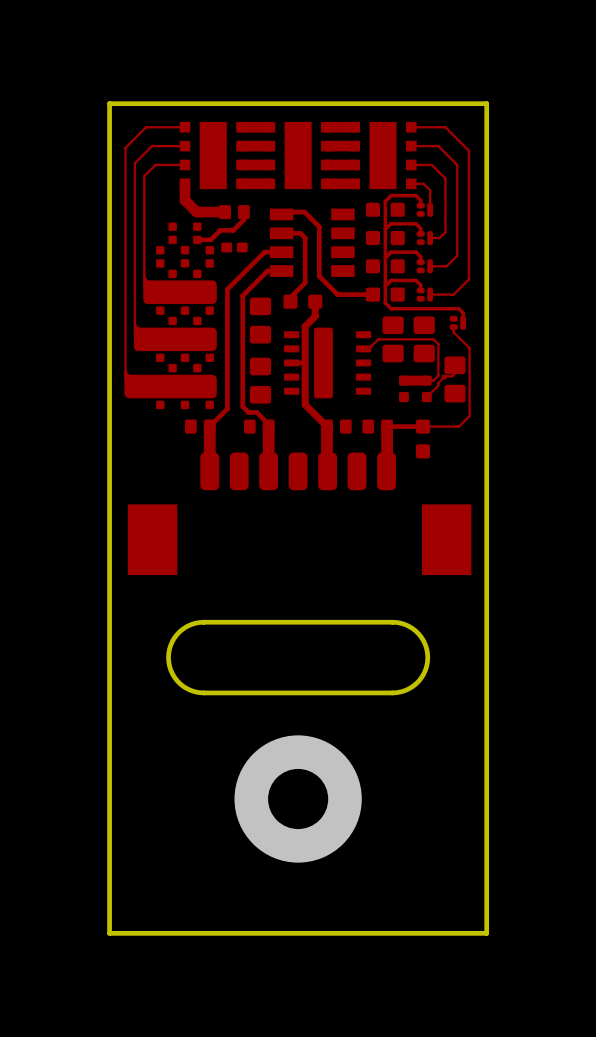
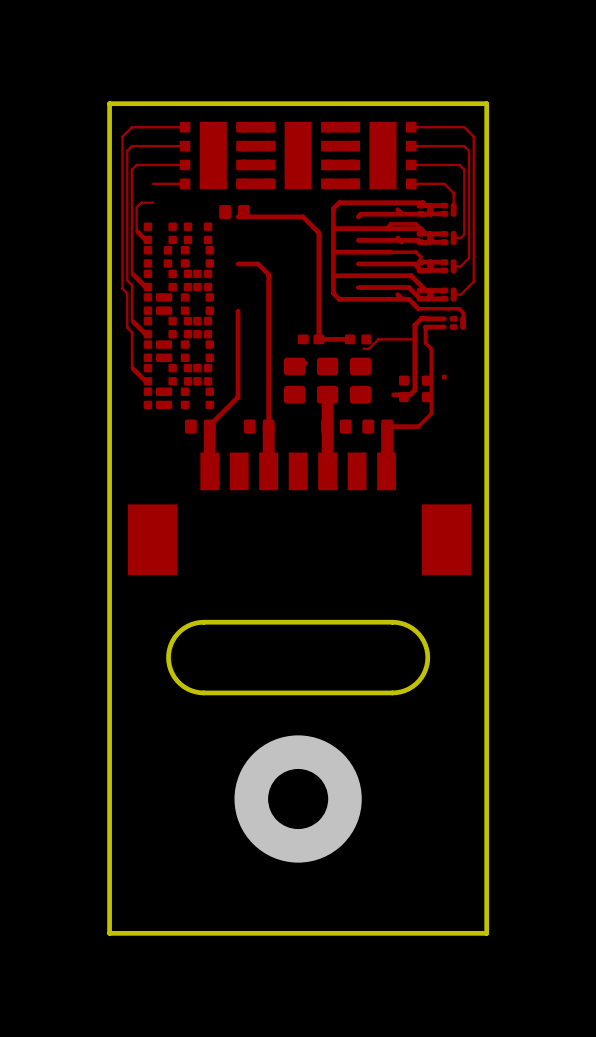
top track: (146, 127) (125, 147) -> (146, 127) (131, 127) (122, 136) (122, 288) (127, 293) (127, 327) (131, 332) (131, 367) (146, 382)
top track: (445, 127) (464, 146) -> (438, 146) (464, 146)
top track: none -> (445, 127) (464, 127) (473, 136) (473, 281) (460, 294) (453, 294)
top track: (152, 146) (134, 163) (134, 332) -> (152, 146) (131, 146) (127, 150) (127, 280) (131, 285) (131, 320) (146, 335)
top track: (438, 146) (457, 164) (457, 255) (446, 266) (430, 266) -> none
top track: (125, 147) (125, 379) -> none
top track: (155, 164) (144, 176) (144, 285) -> (155, 164) (136, 164) (131, 169) (131, 273) (146, 288)
top track: (431, 164) (445, 178) (445, 232) (439, 238) (430, 238) -> (431, 164) (459, 164) (464, 169) (464, 234) (460, 238) (453, 238)
top track: (185, 183) (185, 200) (196, 212) (225, 212) -> (185, 183) (153, 183)
top track: (423, 183) (430, 190) (430, 209) -> (423, 183) (444, 183) (453, 193) (453, 209)
top track: none -> (153, 202) (141, 202) (136, 207) (136, 230) (146, 241)
top track: (420, 205) (420, 200) (415, 195) (391, 195) (385, 201) (385, 302) (391, 308) (418, 308) -> (444, 205) (425, 205) (422, 202) (339, 202) (333, 208) (333, 293) (339, 299) (408, 299) (418, 308)
part: (385, 209) -> none
part: none -> (448, 209)
top track: (243, 212) (243, 219) (233, 230) (220, 230) (210, 239) (197, 239) -> none
top track: none -> (444, 213) (360, 214) (358, 216)
top track: (281, 214) (283, 212) (304, 212) (319, 226) (319, 276) (337, 294) (372, 294) -> none
top track: none -> (238, 216) (302, 216) (318, 232) (318, 339) (349, 339)
top track: none -> (333, 228) (420, 228) (425, 233) (444, 233)
part: none -> (147, 233)
part: none -> (187, 233)
part: (197, 233) -> none
part: none -> (207, 233)
top track: (281, 233) (300, 233) (305, 238) (305, 282) (290, 297) (290, 301) -> none
part: (385, 238) -> none
part: none -> (448, 238)
top track: none -> (358, 240) (444, 242)
part: (312, 242) -> none
part position: (234, 247) -> (311, 339)
top track: (281, 252) (264, 252) (227, 289) (227, 408) (209, 426) -> (238, 311) (238, 397) (209, 426)
top track: (391, 252) (385, 258) -> (391, 252) (333, 252)
part: none -> (147, 256)
part: (160, 256) -> none
part: none -> (167, 256)
top track: (469, 258) (469, 279) (453, 294) (430, 294) -> (469, 258) (460, 266) (453, 266)
top track: none -> (444, 262) (425, 262)
top track: none -> (358, 263) (414, 263) (421, 270) (444, 270)
part: (385, 266) -> none
part: none -> (448, 266)
top track: (281, 271) (267, 271) (242, 295) (242, 406) (248, 412) (256, 412) (268, 424) -> (238, 263) (258, 263) (268, 274) (268, 424)
drawing: [124, 275, 217, 399] -> none
top track: none -> (333, 275) (411, 275) (425, 290) (444, 290)
part: none -> (147, 280)
part: none -> (187, 280)
part: none -> (207, 280)
top track: (385, 286) (391, 280) (415, 280) (420, 285) (420, 290) -> none
top track: none -> (358, 287) (408, 287) (420, 299) (444, 298)
part: (385, 294) -> none
part: none -> (448, 294)
part: (302, 301) -> none
top track: (315, 301) (315, 316) (305, 326) (305, 404) (327, 426) (327, 471) -> (327, 394) (327, 471)
part: none -> (147, 304)
part: none -> (167, 304)
top track: none -> (444, 318) (421, 318) (414, 325) (414, 390) (410, 394) (393, 394)
part: (260, 320) -> none
part: none -> (147, 327)
part: none -> (187, 327)
part: none -> (207, 327)
top track: (453, 327) (453, 332) (469, 348) (469, 415) (459, 426) (418, 426) -> (444, 327) (425, 327) (425, 342) (431, 348) (431, 413) (418, 426)
part: none -> (358, 339)
part: (393, 339) -> none
top track: (414, 339) (433, 339) (438, 344) (438, 375) (433, 380) (403, 380) -> none
part: (424, 339) -> none
part: none -> (147, 351)
part: none -> (167, 351)
part: (327, 362) -> none
top track: (454, 365) (454, 373) (452, 376) (445, 376) (426, 397) -> none
part: none -> (147, 374)
part: none -> (187, 374)
part: none -> (207, 374)
part: (454, 379) -> none
part: (260, 380) -> none
part: none -> (294, 380)
part: none -> (327, 380)
part: none -> (360, 380)
part: none -> (147, 398)
part: none -> (167, 398)
part: (423, 438) -> none
part footprint: [127, 452, 472, 576] -> [127, 452, 472, 576]

